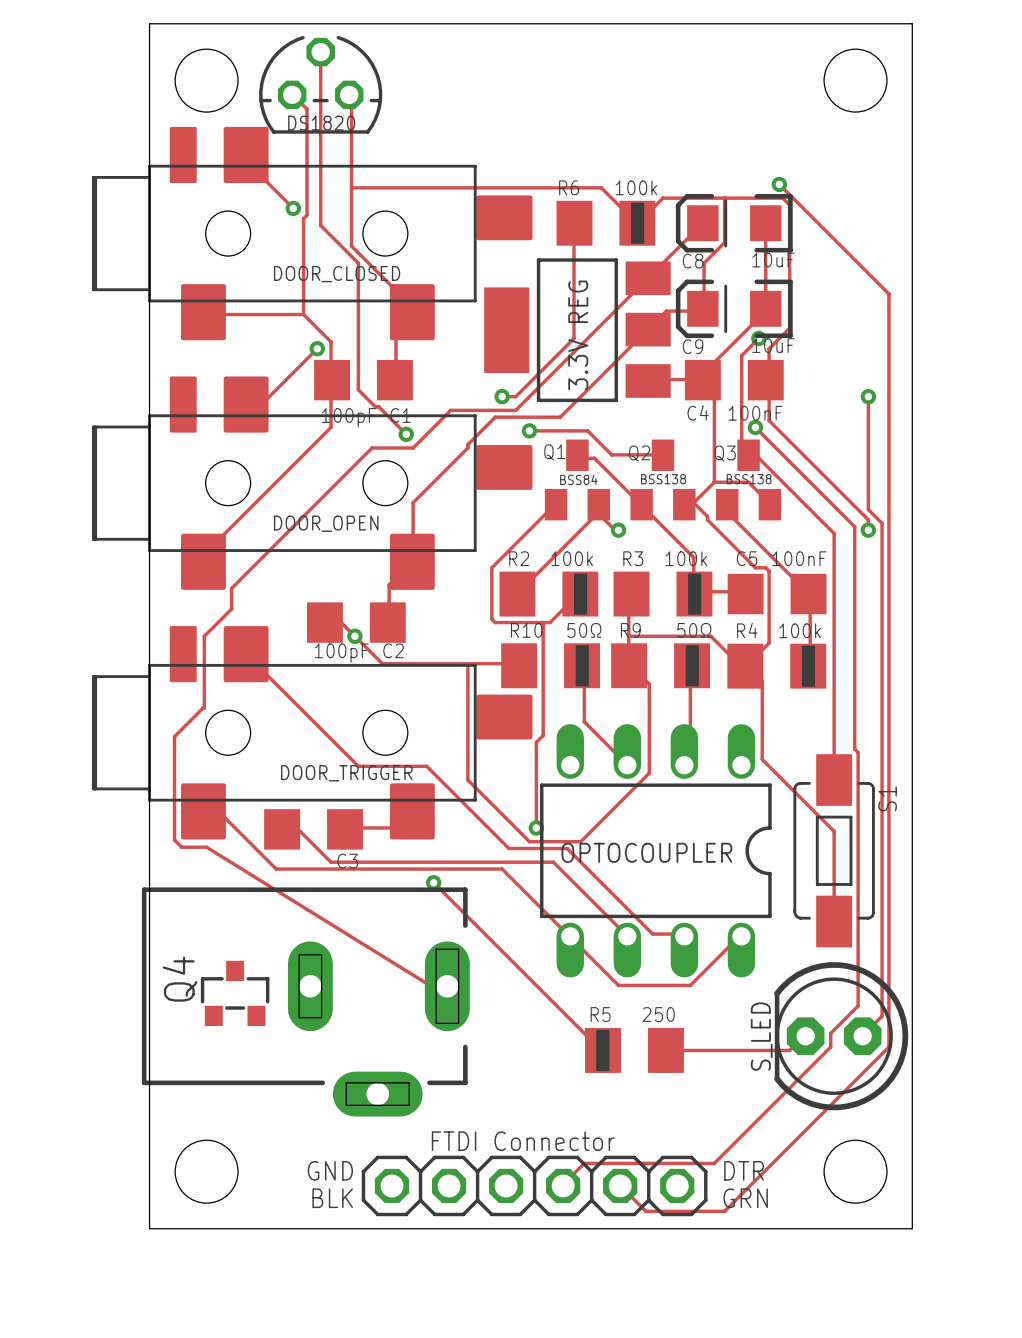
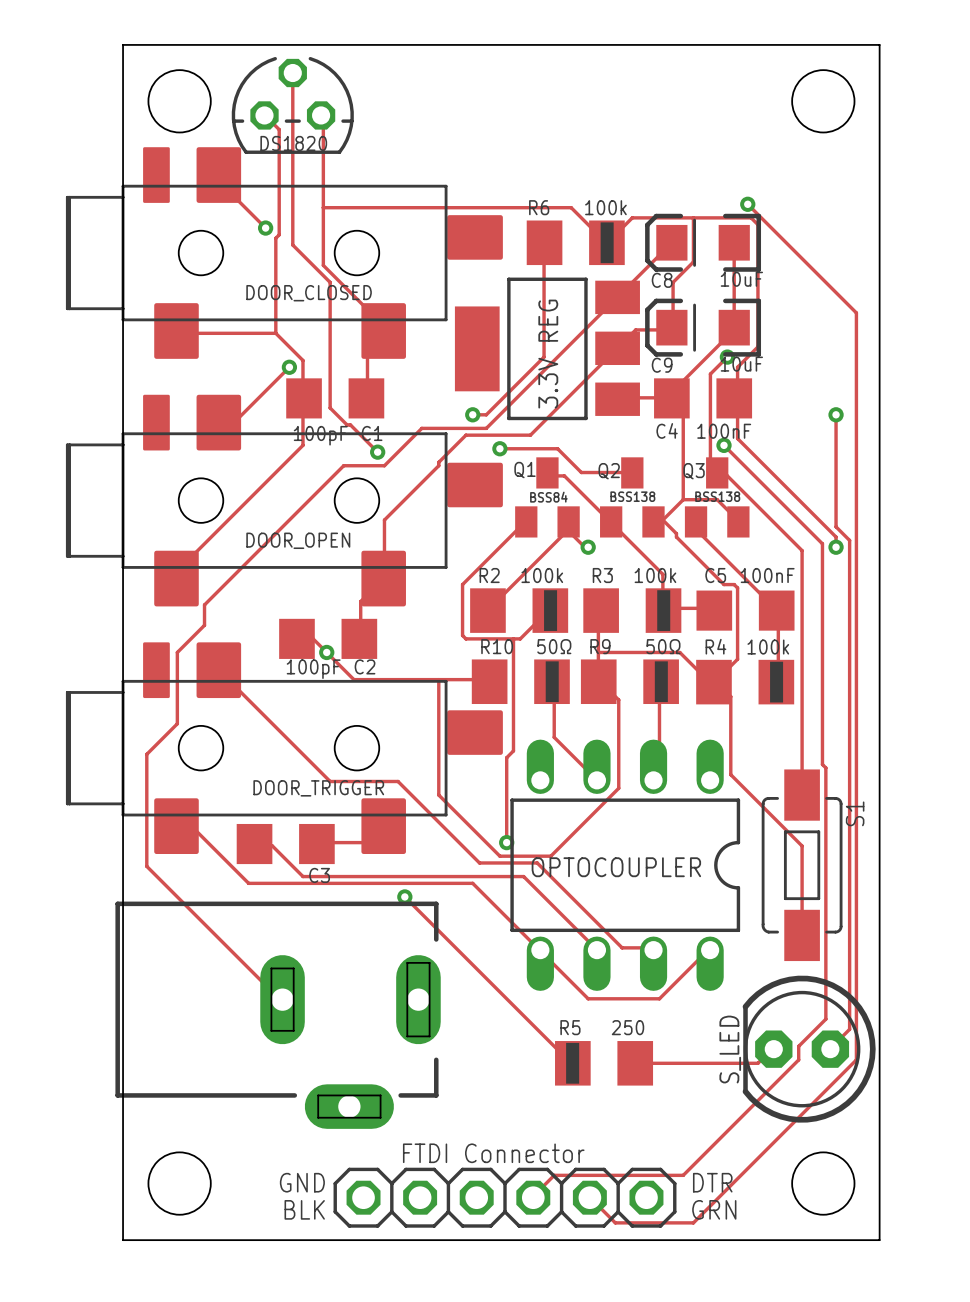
track: (204, 708) (174, 736) (174, 840) (181, 847) (206, 847) (431, 986) (447, 986) -> (177, 723) (146, 754) (146, 866) (279, 998) (282, 999)
Q4: (235, 993) -> none

